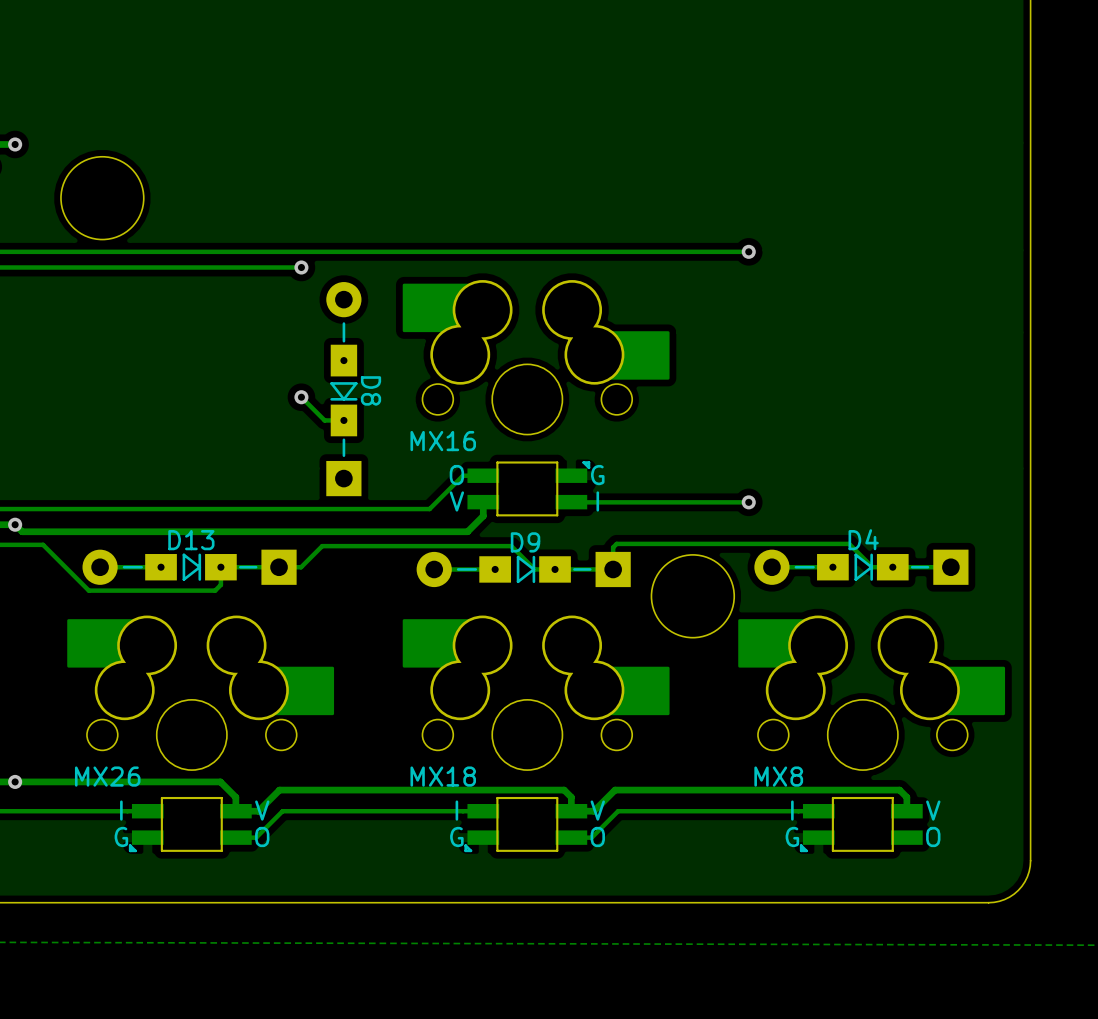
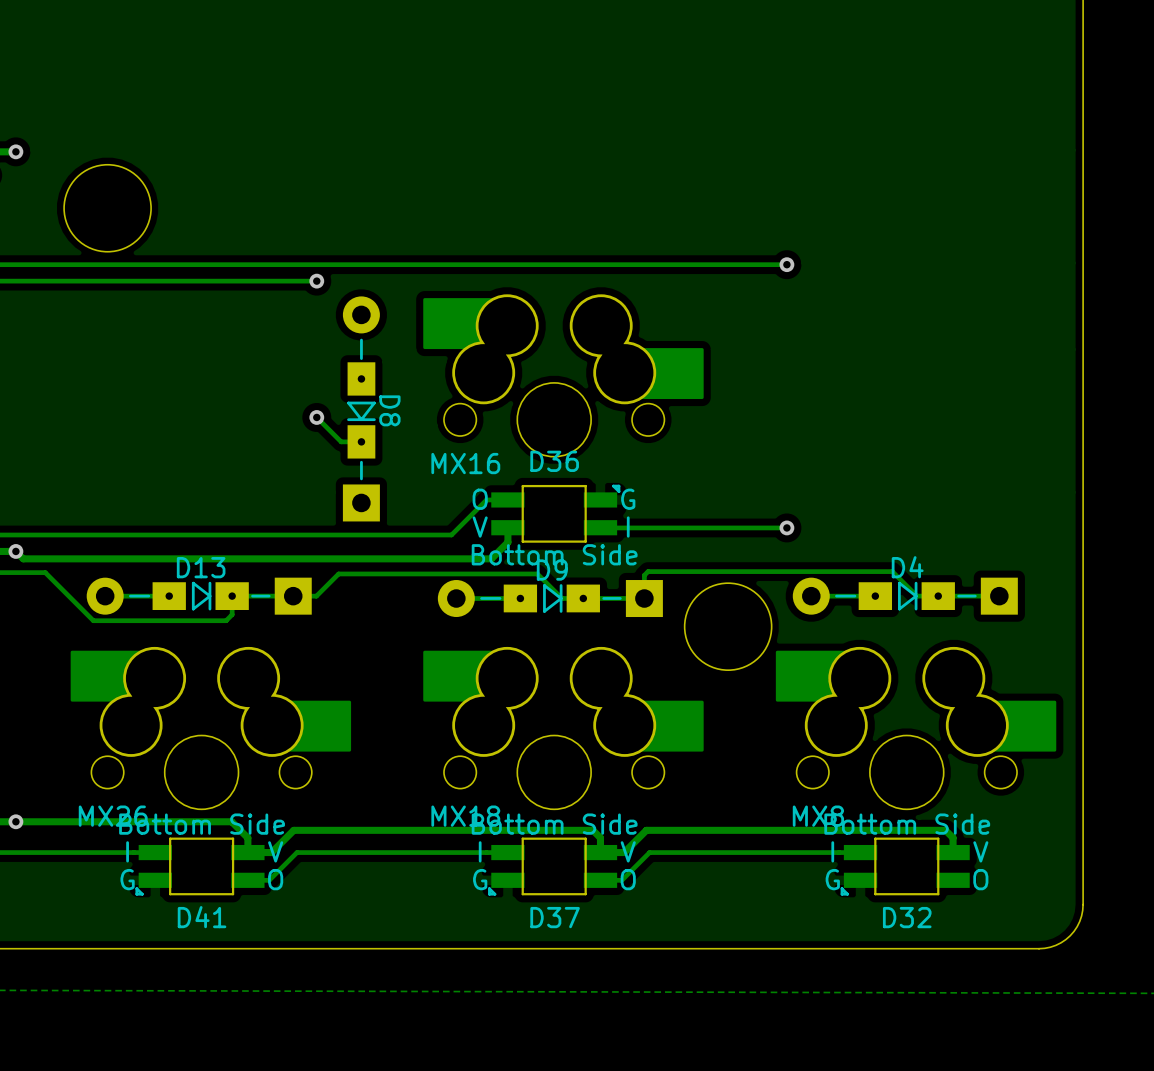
D36 name: none -> D36 (554, 461)
D36 text: none -> Bottom Side (554, 554)
D41 text: none -> Bottom Side (202, 824)
D37 text: none -> Bottom Side (554, 824)
D32 text: none -> Bottom Side (907, 824)
D41 name: none -> D41 (202, 917)
D37 name: none -> D37 (555, 917)
D32 name: none -> D32 (907, 917)

